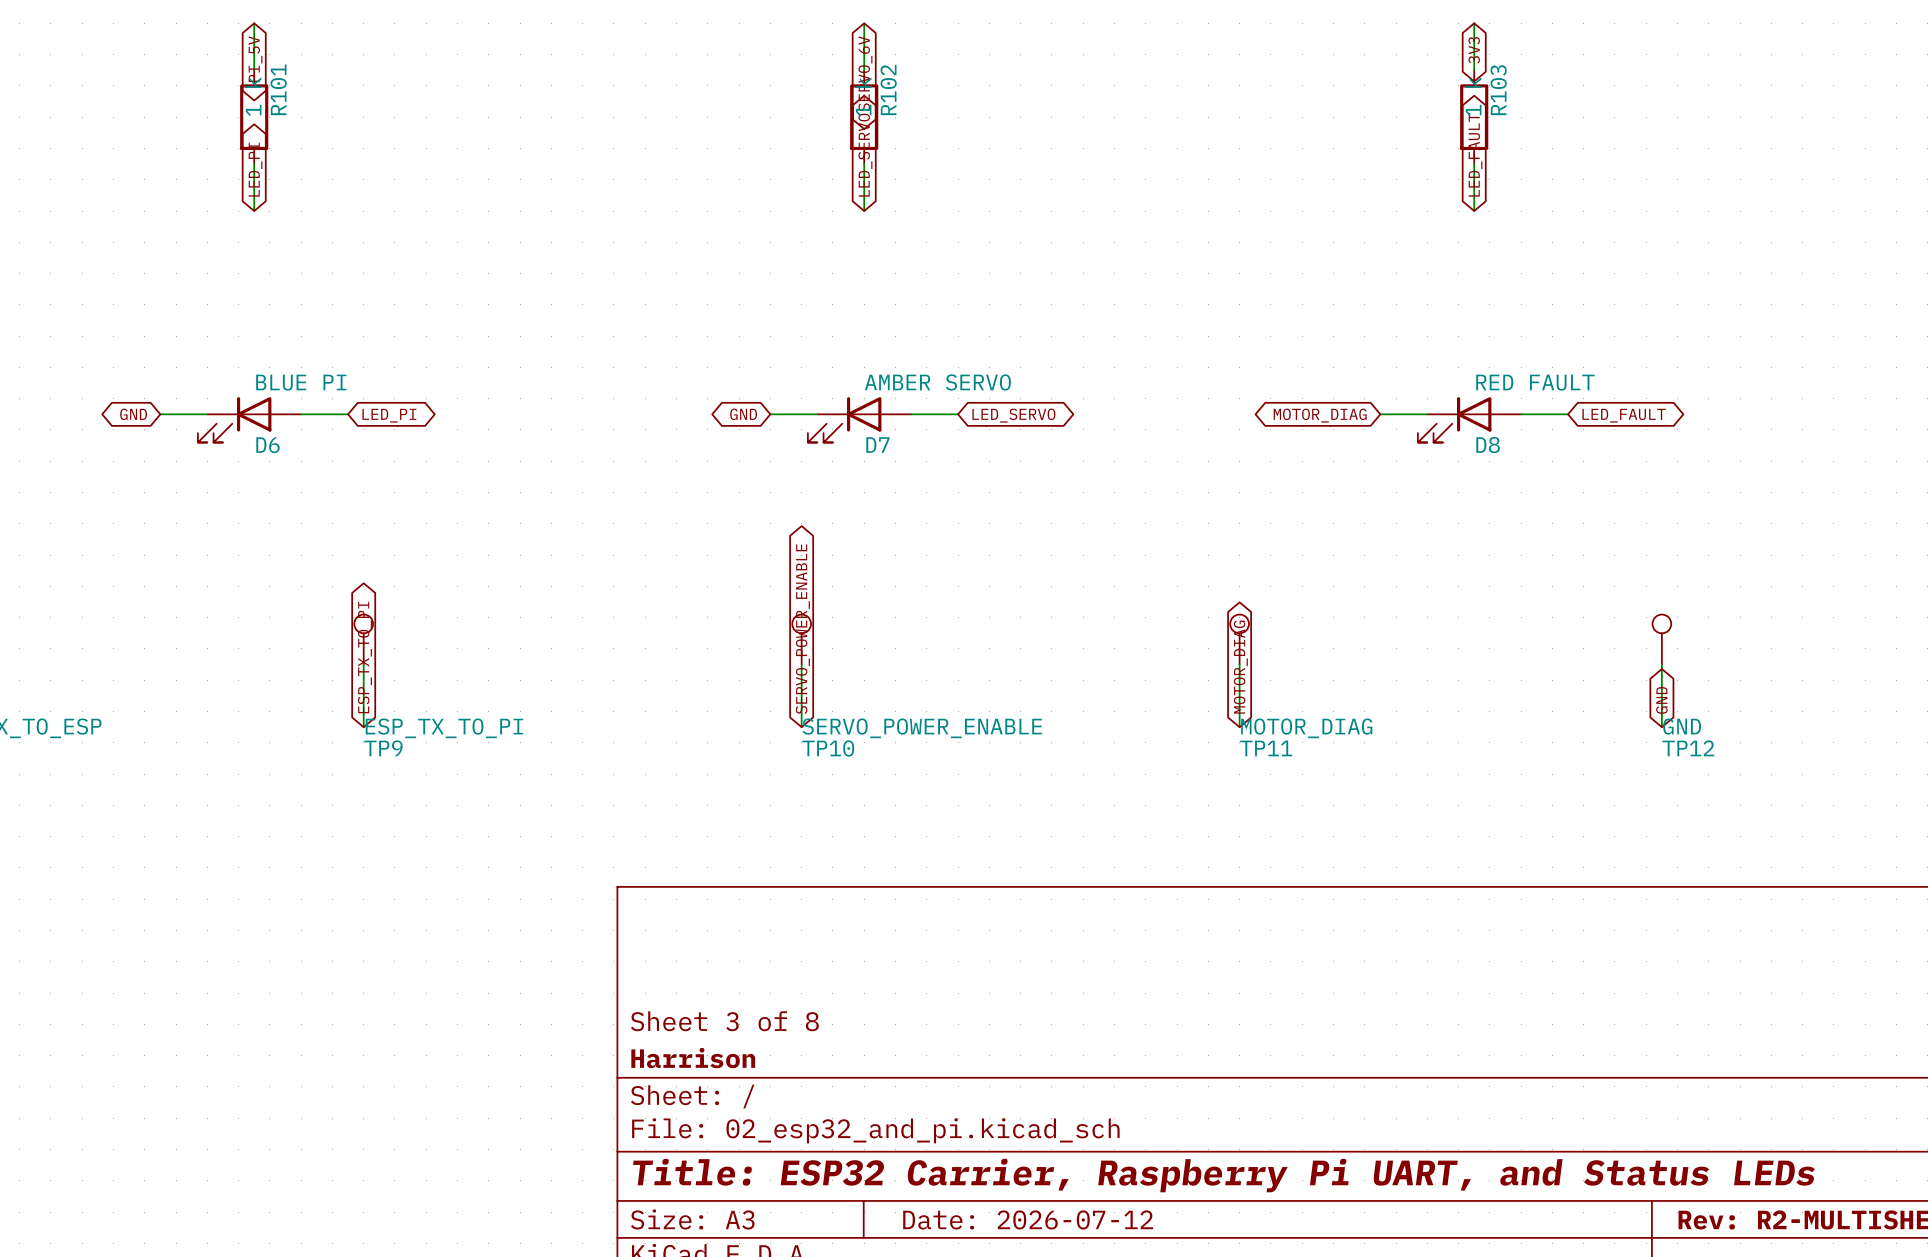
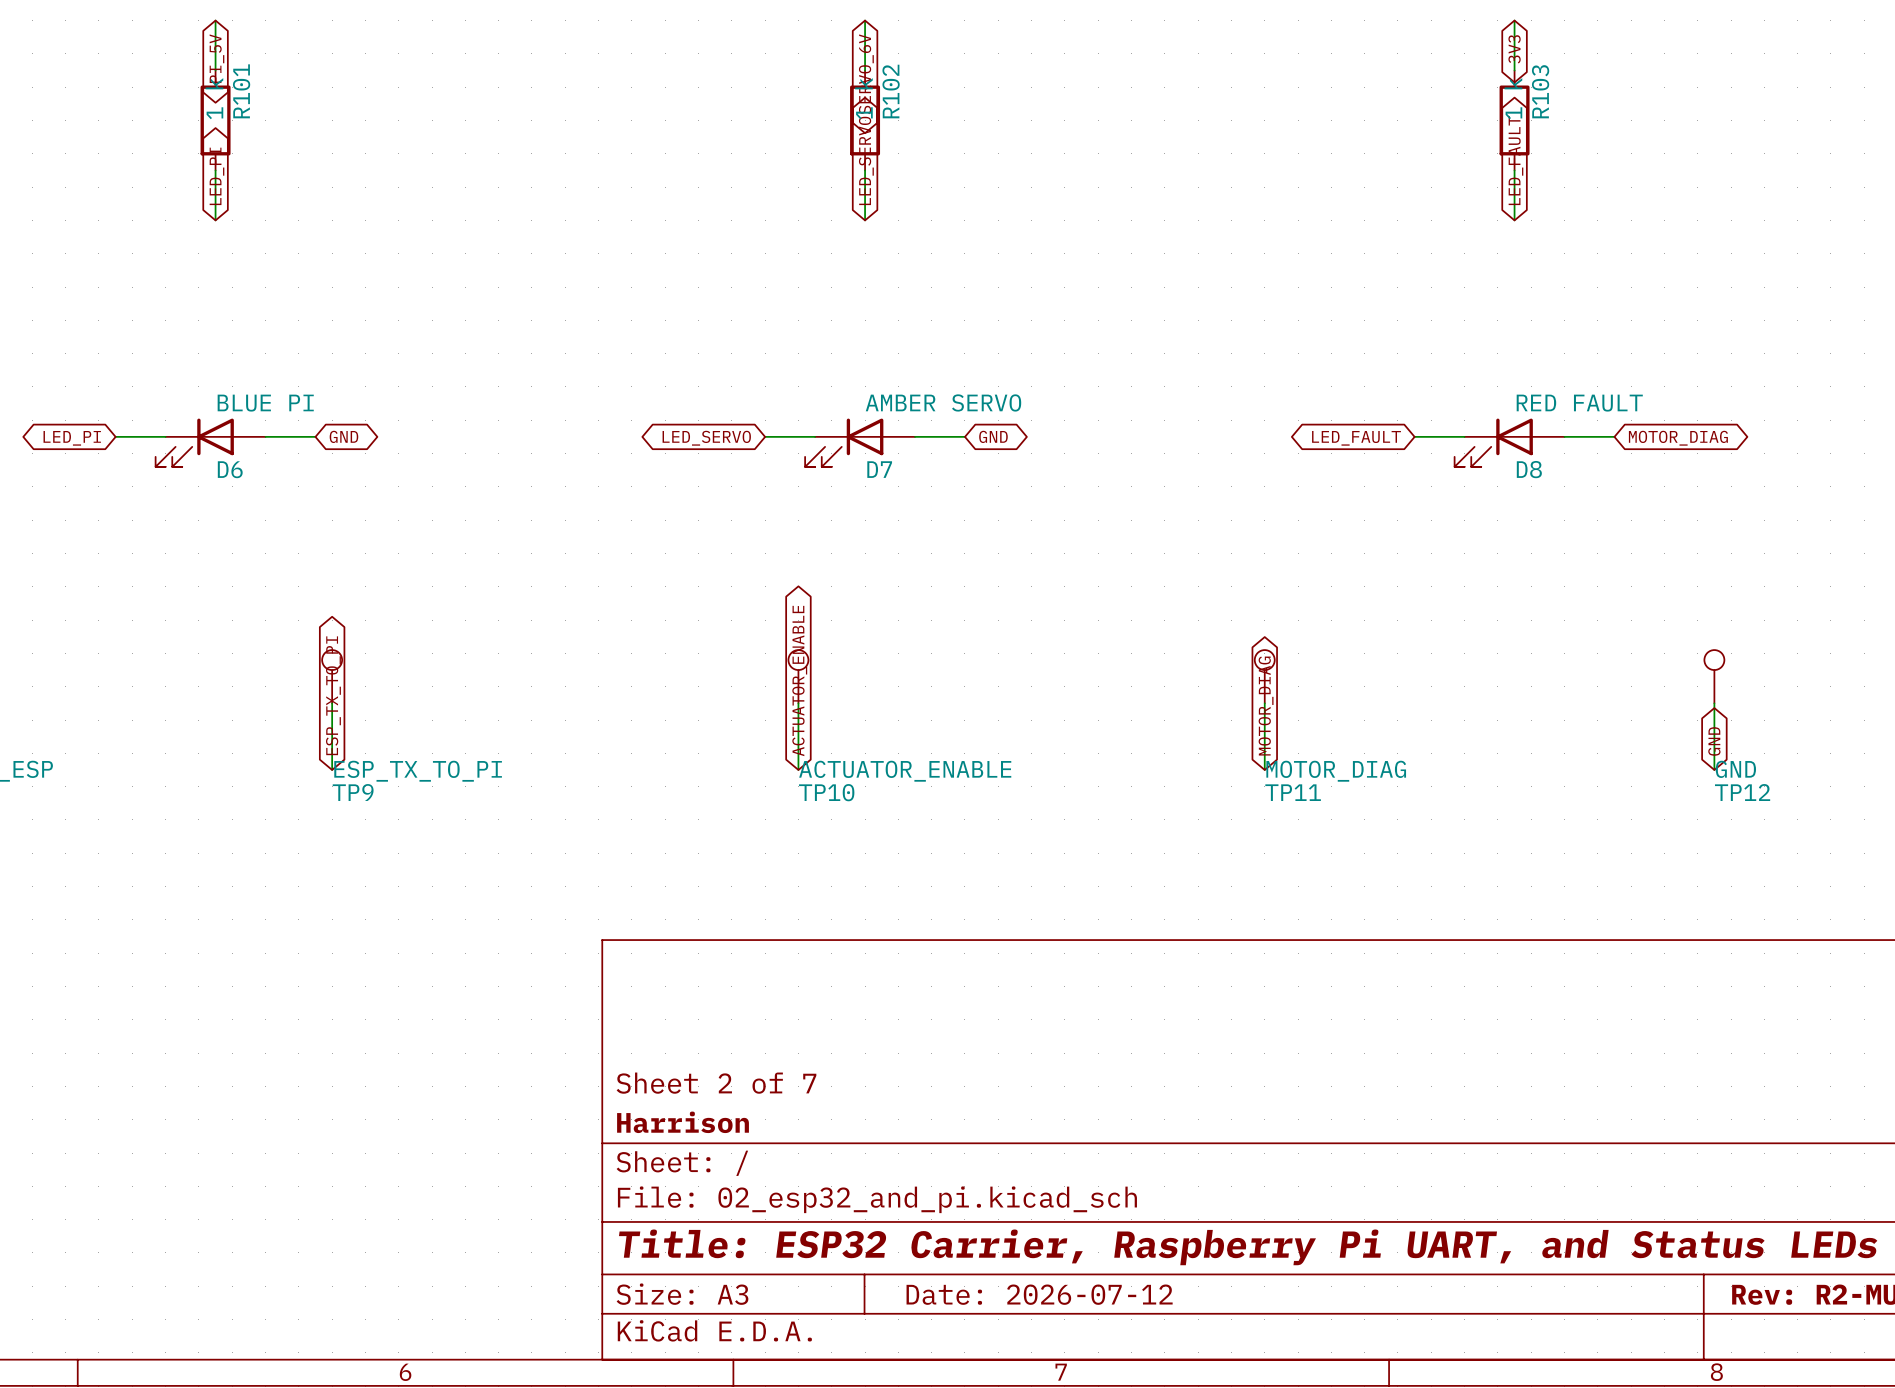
global label: GND (133, 414) -> LED_PI (72, 438)
global label: GND (743, 414) -> LED_SERVO (706, 438)
global label: LED_PI (389, 415) -> GND (343, 436)
global label: LED_SERVO (1013, 415) -> GND (993, 436)
global label: MOTOR_DIAG (1320, 415) -> LED_FAULT (1356, 438)
global label: LED_FAULT (1624, 415) -> MOTOR_DIAG (1678, 438)
global label: SERVO_POWER_ENABLE (802, 629) -> ACTUATOR_ENABLE (799, 681)
TP10 value: SERVO_POWER_ENABLE (922, 728) -> ACTUATOR_ENABLE (905, 771)
title block: Sheet 3 of 8 (724, 1021) -> Sheet 2 of 7 (716, 1083)

